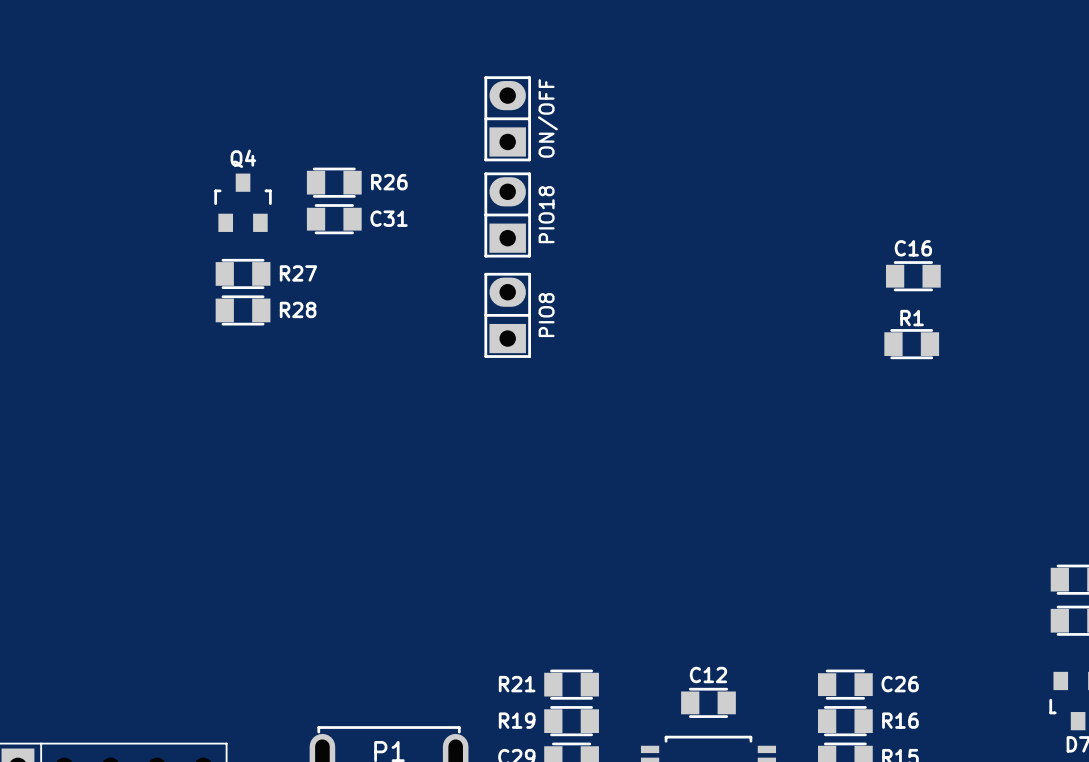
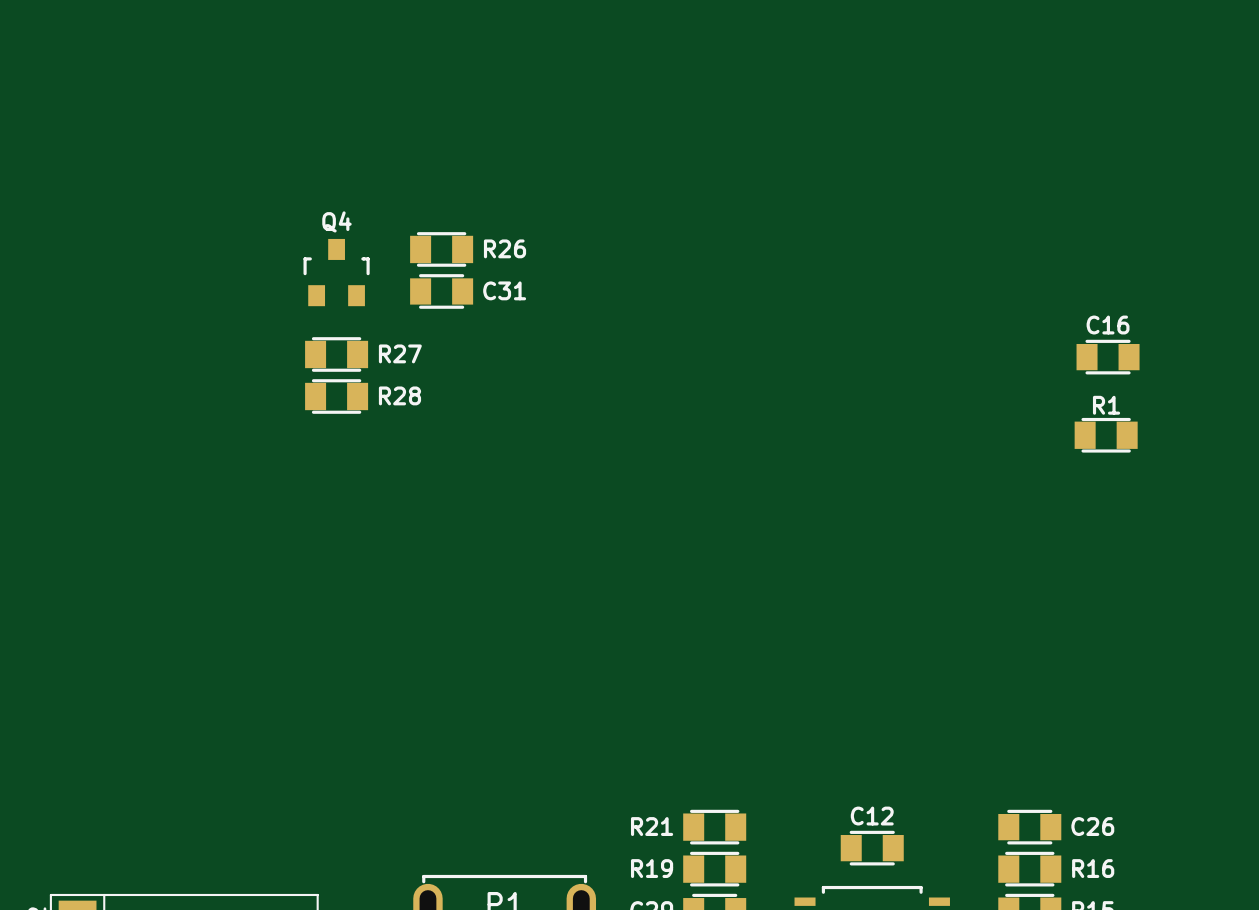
part: ON/OFF (507, 118) -> none
part: PIO18 (507, 214) -> none
part: PIO8 (507, 315) -> none

